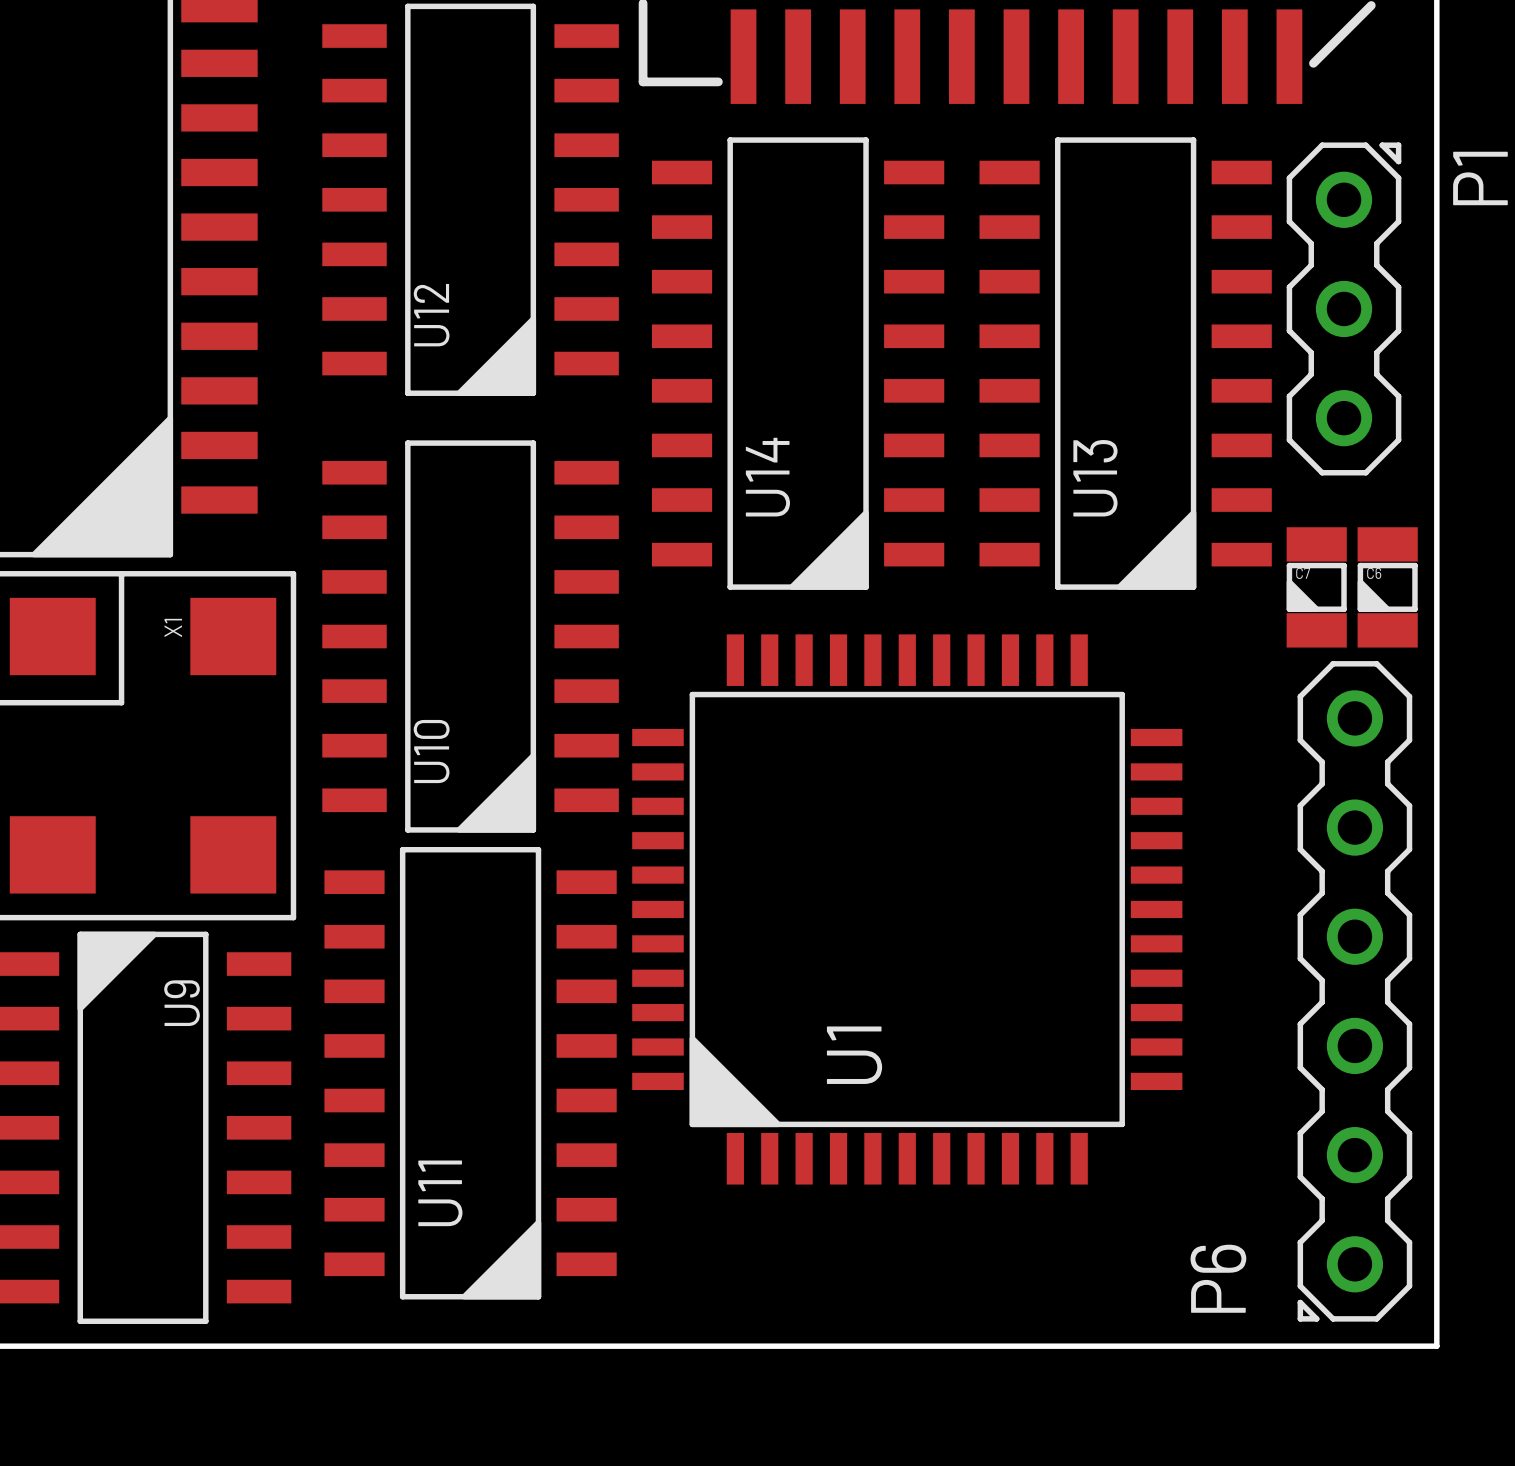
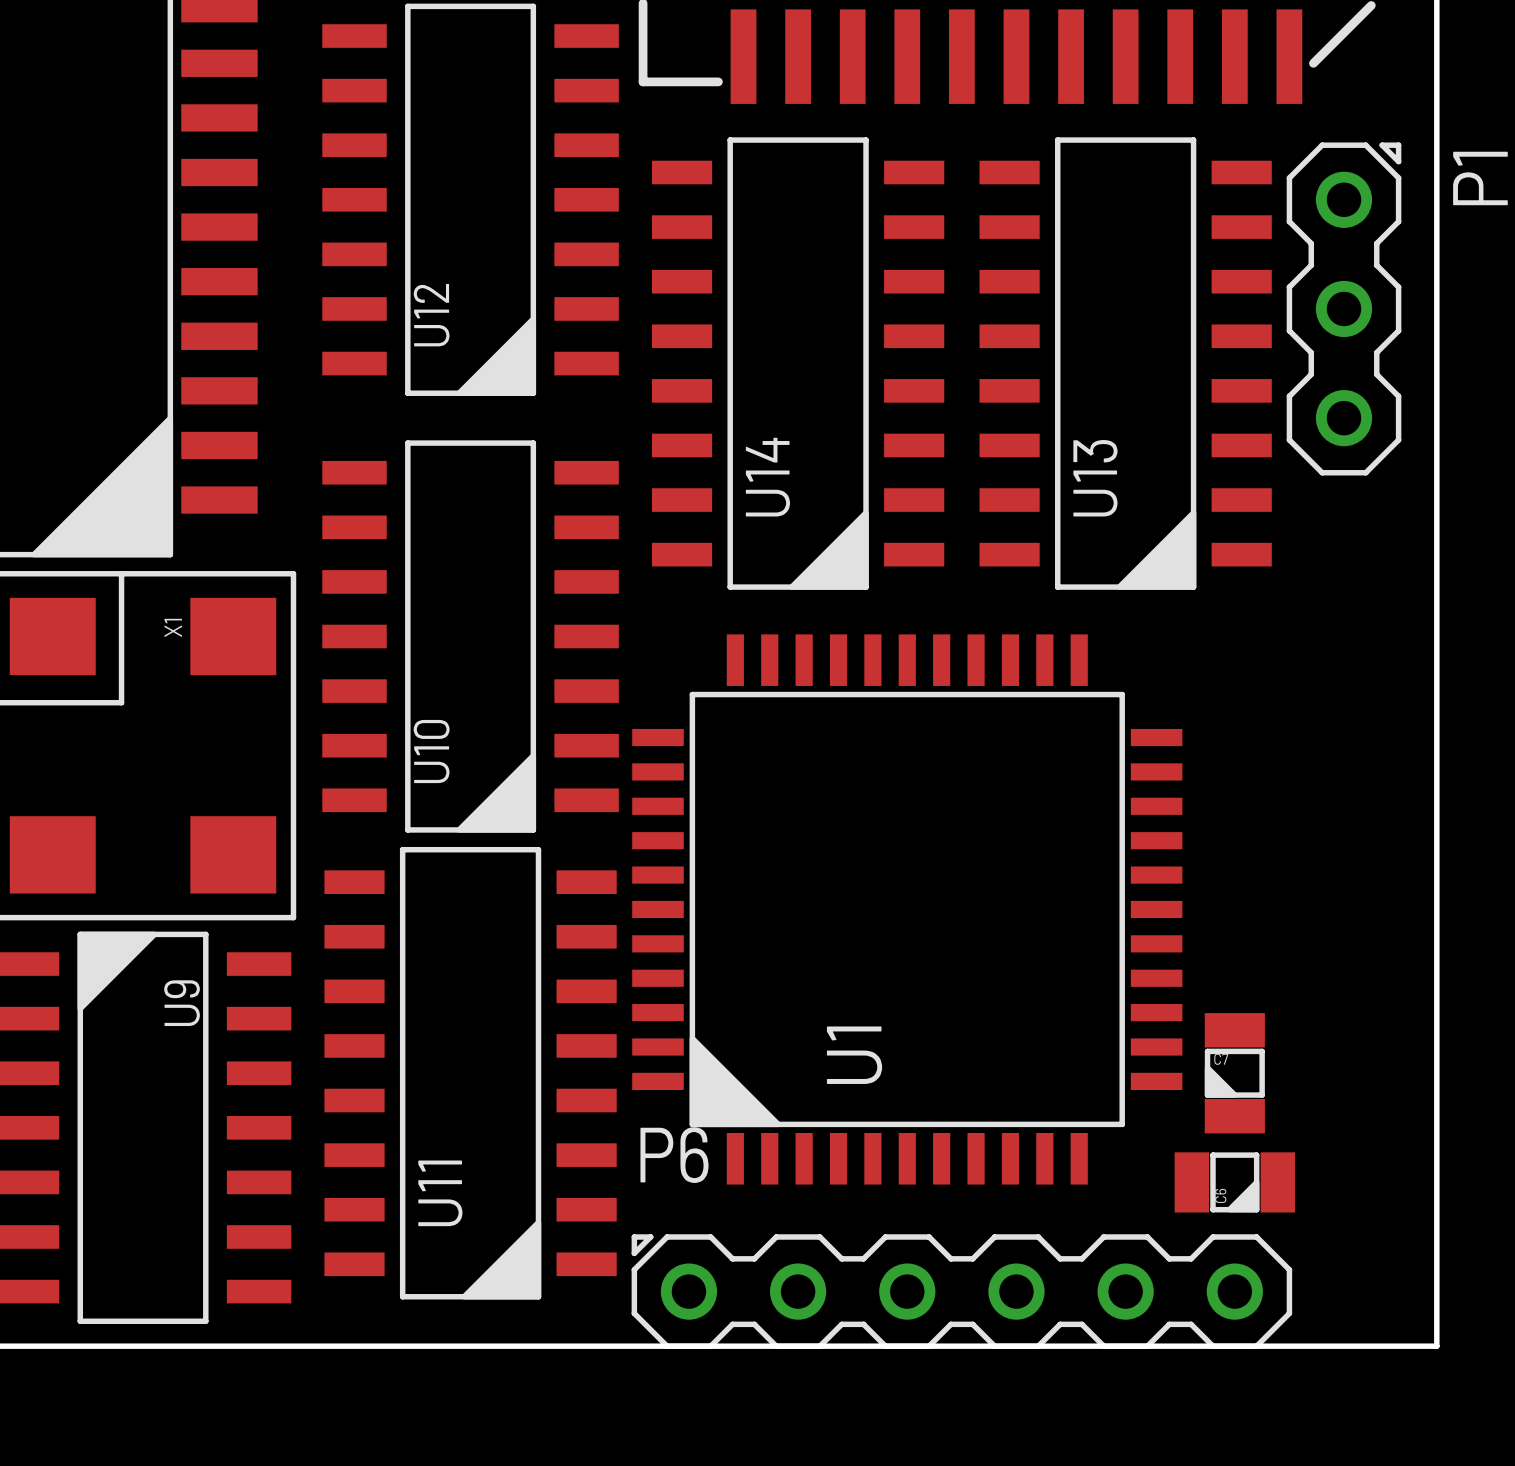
C7 position: (1316, 587) -> (1234, 1073)
C6 rotation: 0° (1387, 587) -> 90° counterclockwise (1234, 1182)
C6 position: (1387, 587) -> (1234, 1182)
P6 rotation: 0° (1354, 991) -> 90° clockwise (961, 1291)
P6 position: (1354, 991) -> (961, 1291)

